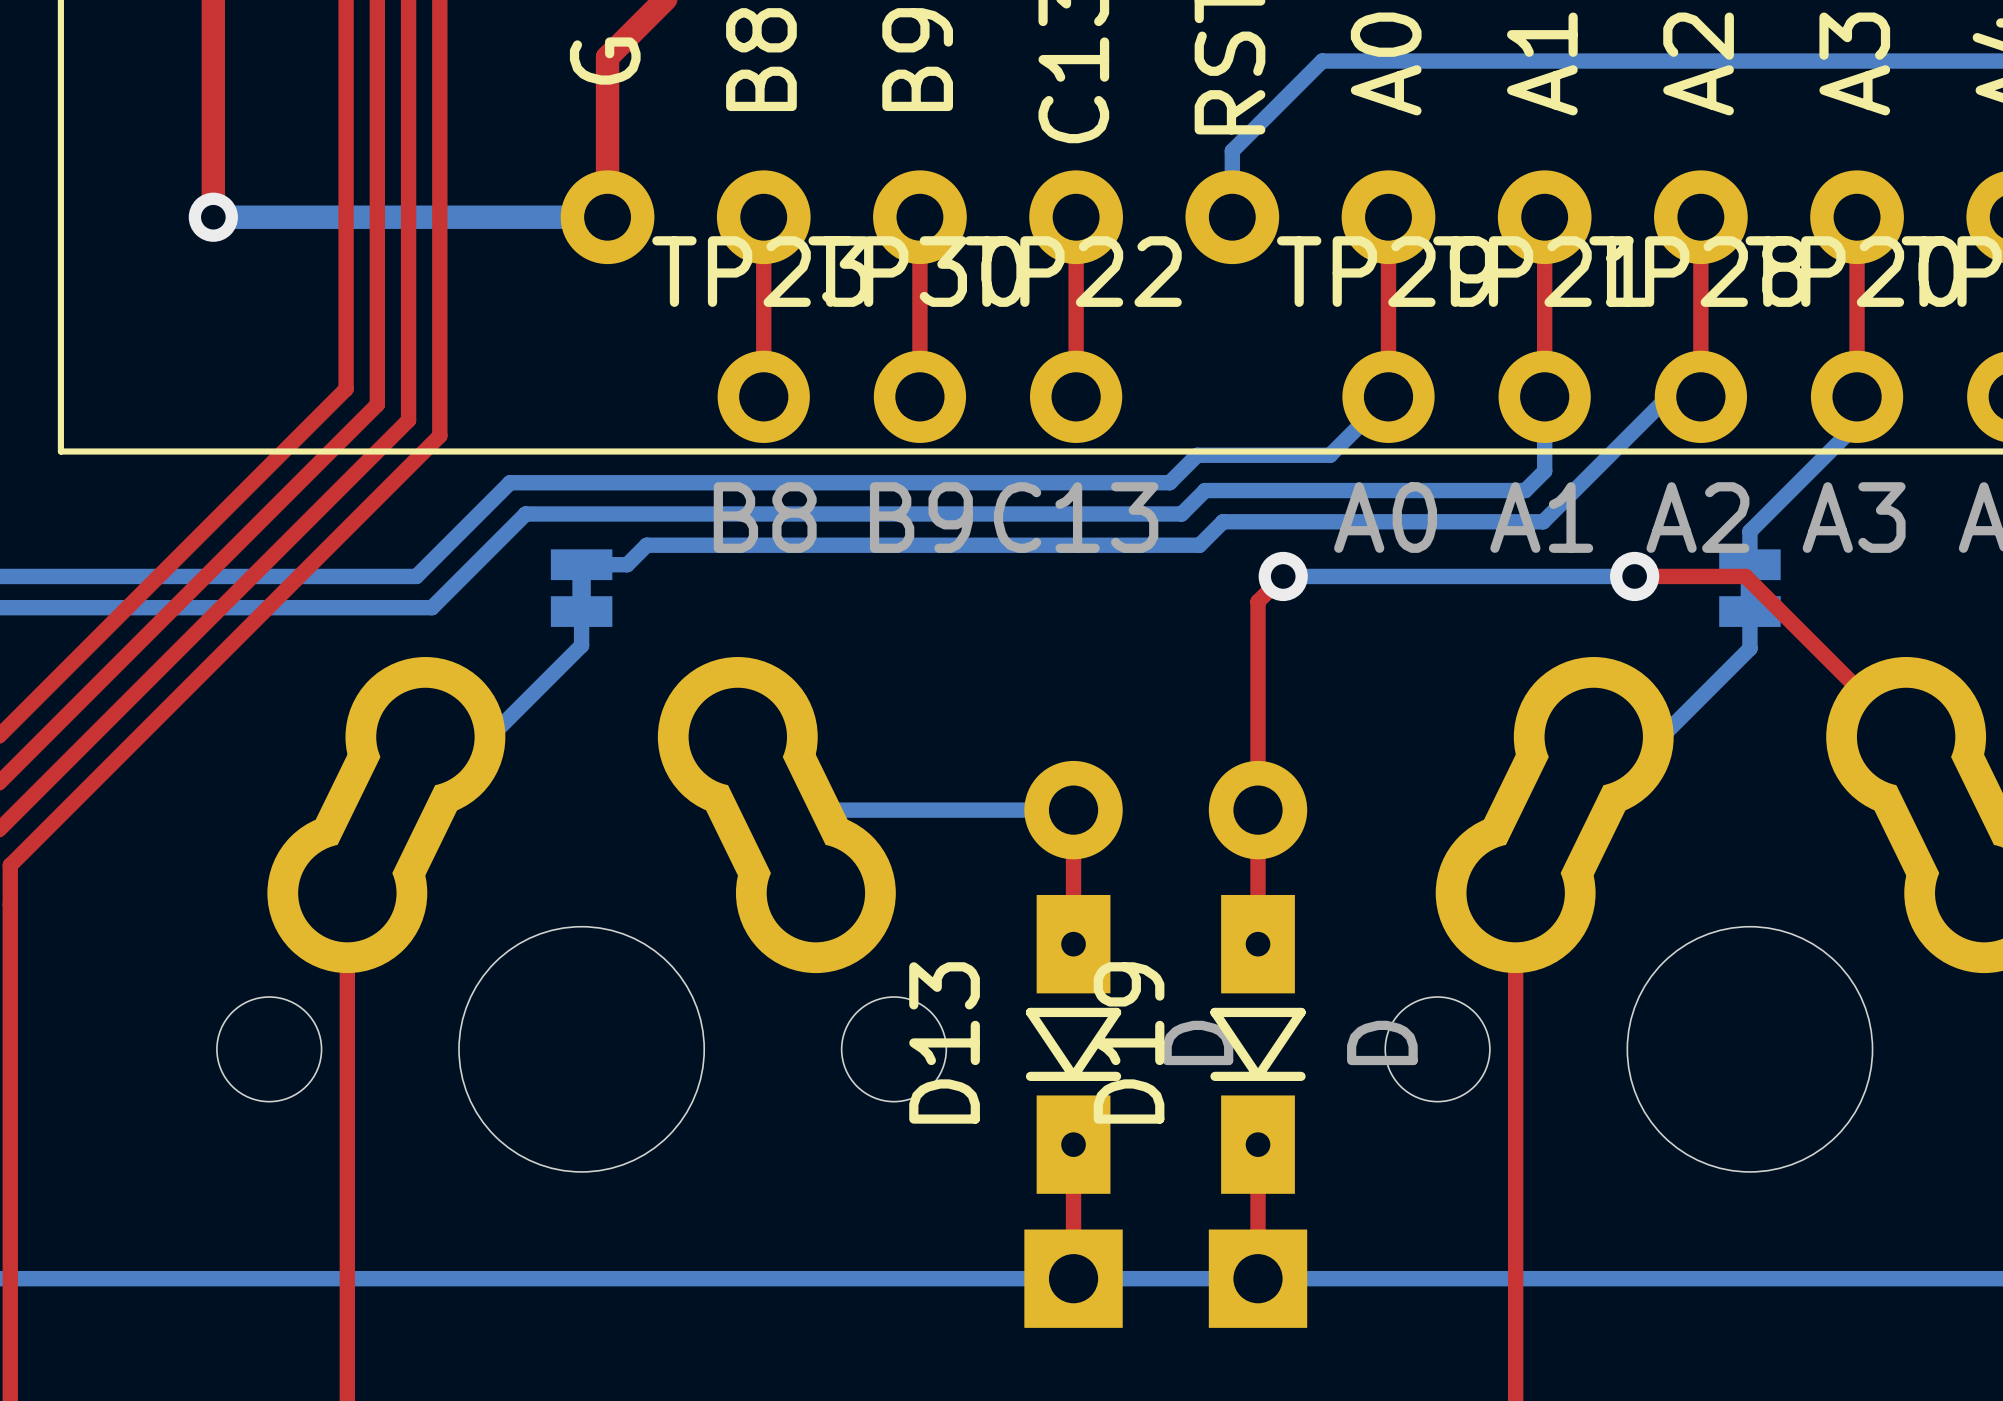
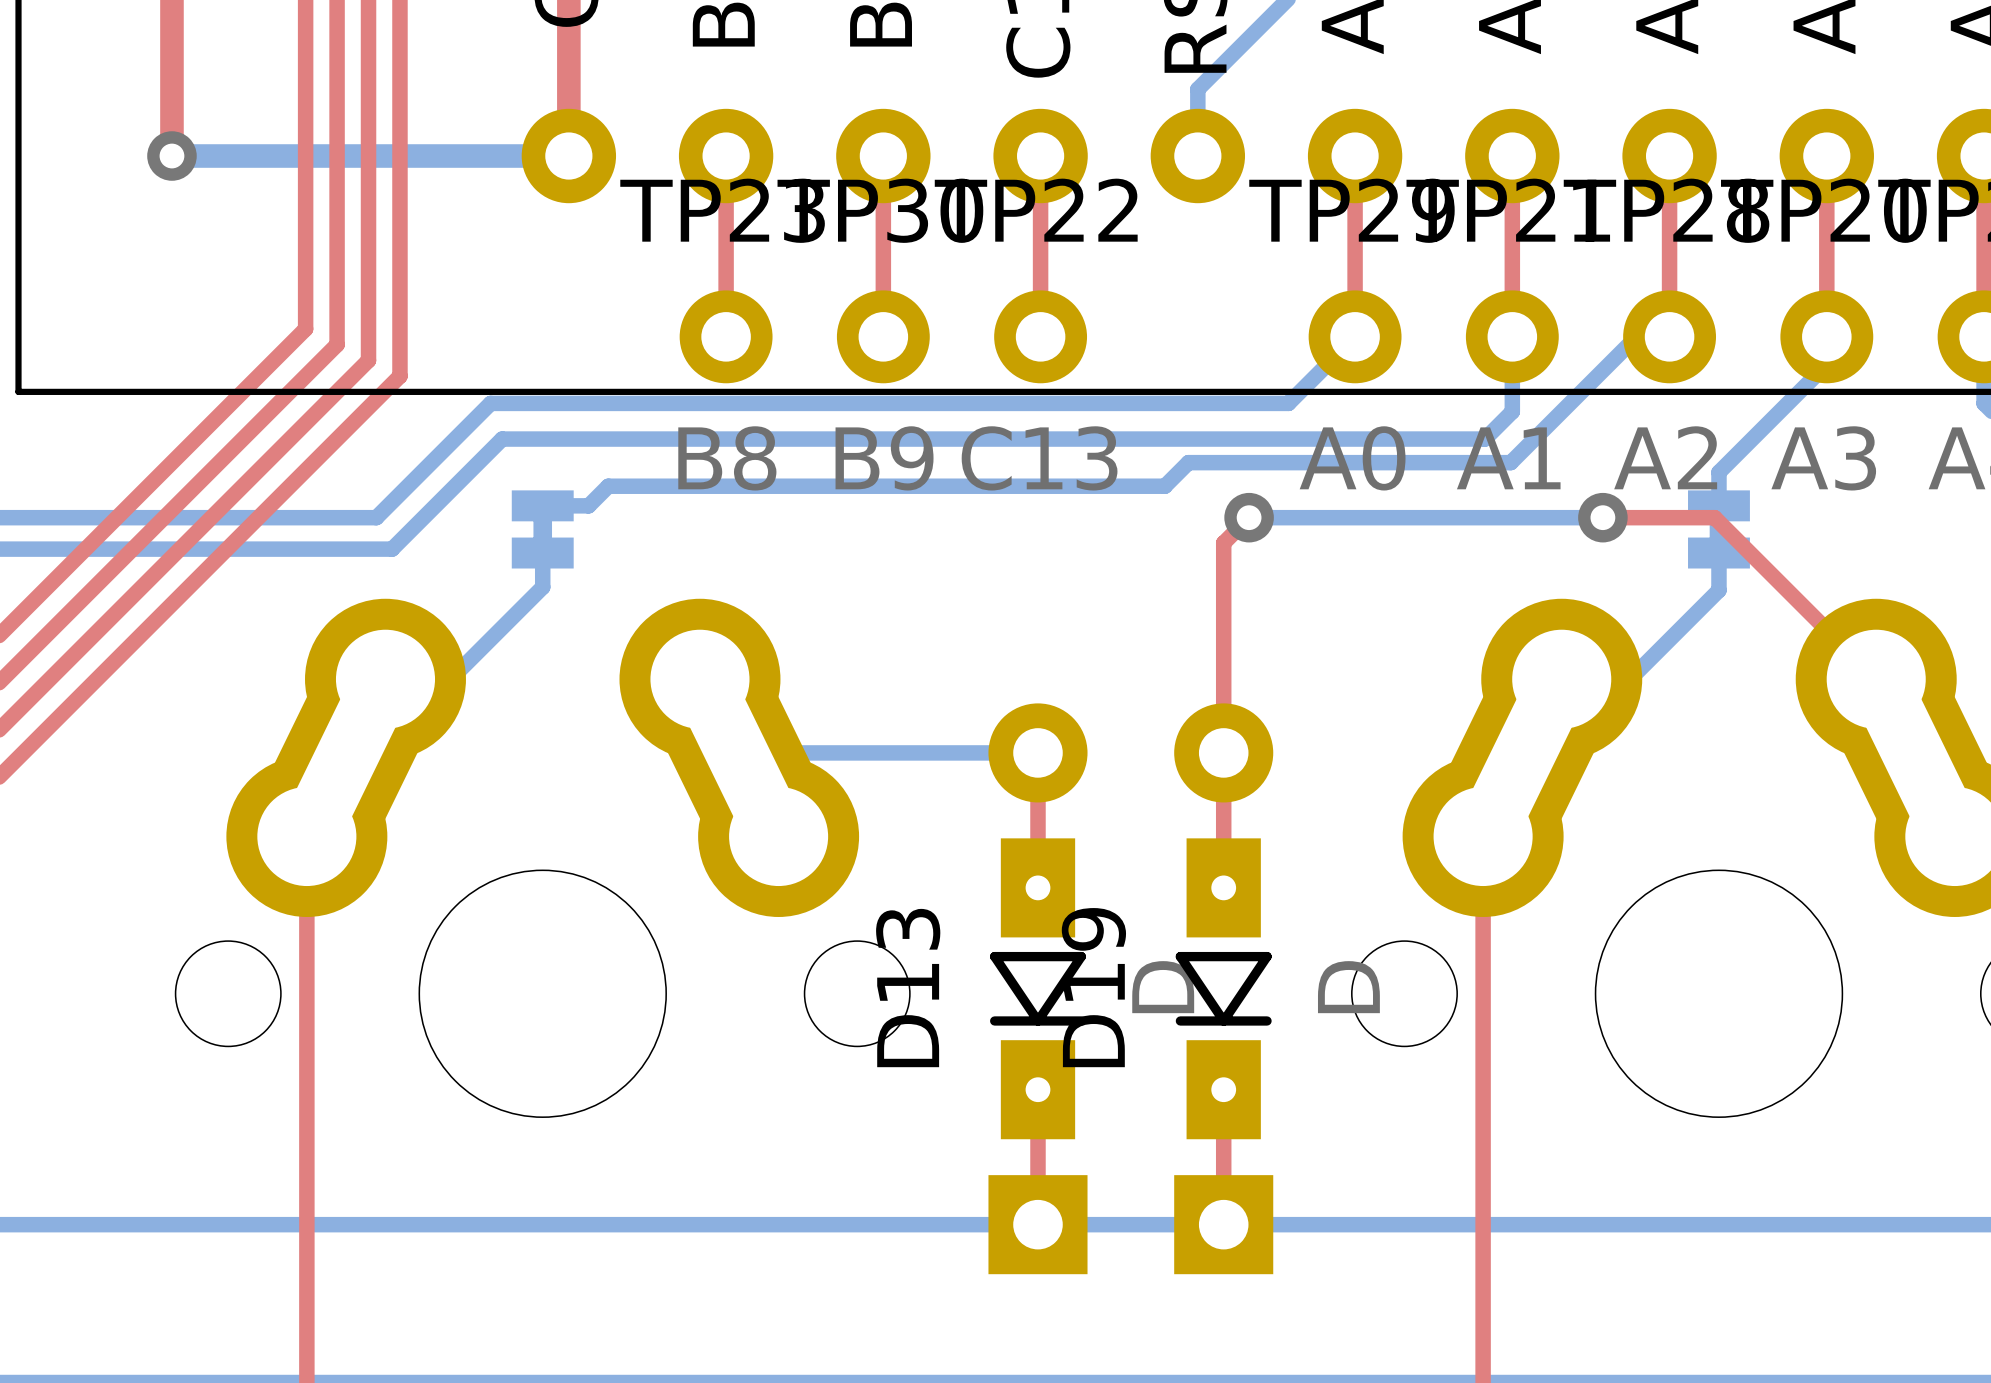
bottom track: (1330, 455) (1197, 455) (1169, 482) (510, 482) -> (1296, 395) (1288, 403) (490, 403) (470, 423)
bottom track: (1525, 490) (1205, 490) (1181, 513) (525, 513) -> (1492, 431) (1484, 439) (502, 439) (486, 454)

